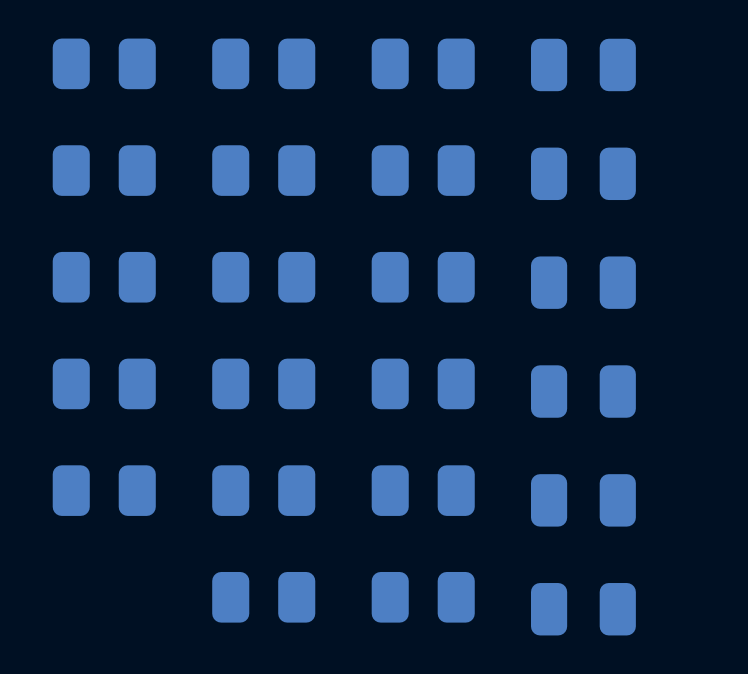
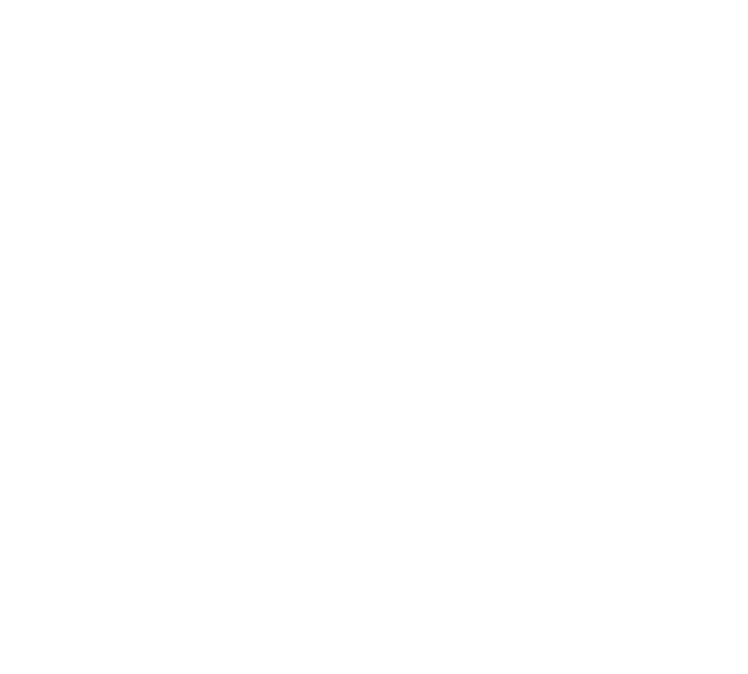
part: (104, 63) -> none
part: (263, 63) -> none
part: (423, 63) -> none
part: (583, 64) -> none
part: (104, 170) -> none
part: (263, 170) -> none
part: (423, 170) -> none
part: (583, 173) -> none
part: (104, 277) -> none
part: (263, 277) -> none
part: (423, 277) -> none
part: (583, 282) -> none
part: (104, 383) -> none
part: (263, 383) -> none
part: (423, 383) -> none
part: (583, 391) -> none
part: (104, 490) -> none
part: (263, 490) -> none
part: (423, 490) -> none
part: (583, 500) -> none
part: (263, 597) -> none
part: (423, 597) -> none
part: (583, 609) -> none

